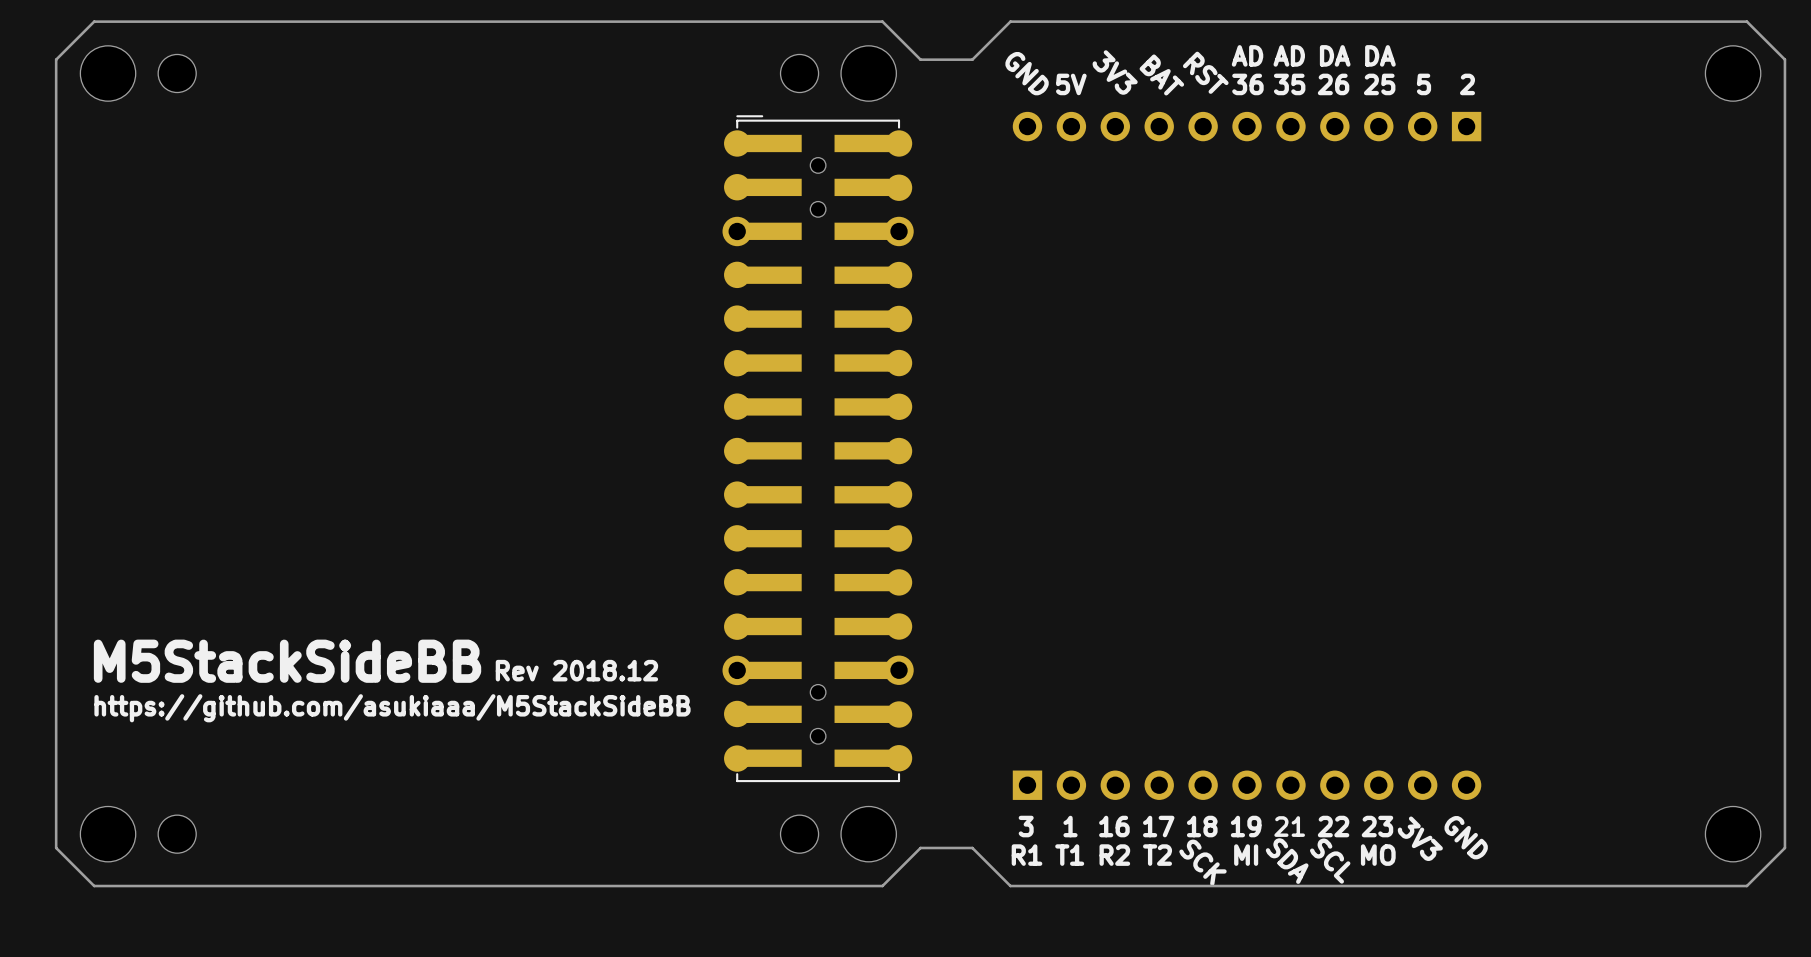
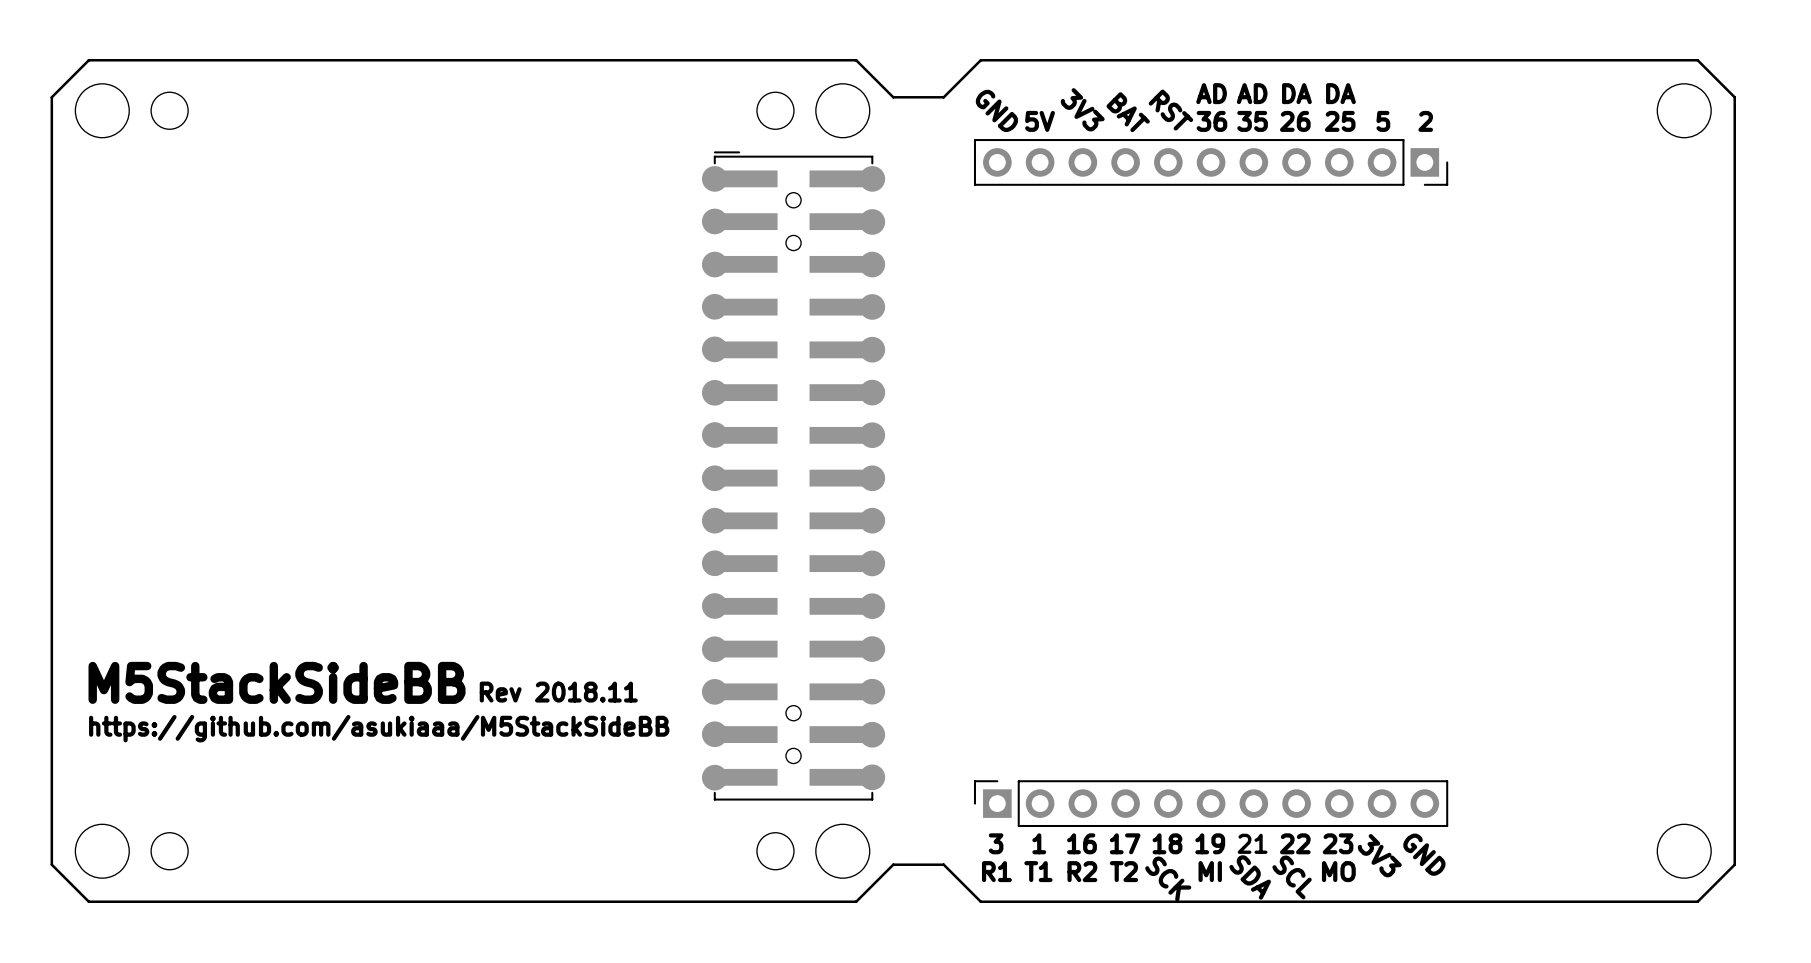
part footprint: [1012, 111, 1482, 142] -> [973, 139, 1449, 186]
part footprint: [722, 115, 914, 783] -> [701, 151, 886, 801]
text: Rev 2018.12 (576, 670) -> Rev 2018.11 (558, 692)
part footprint: [1012, 770, 1482, 800] -> [973, 780, 1449, 828]

